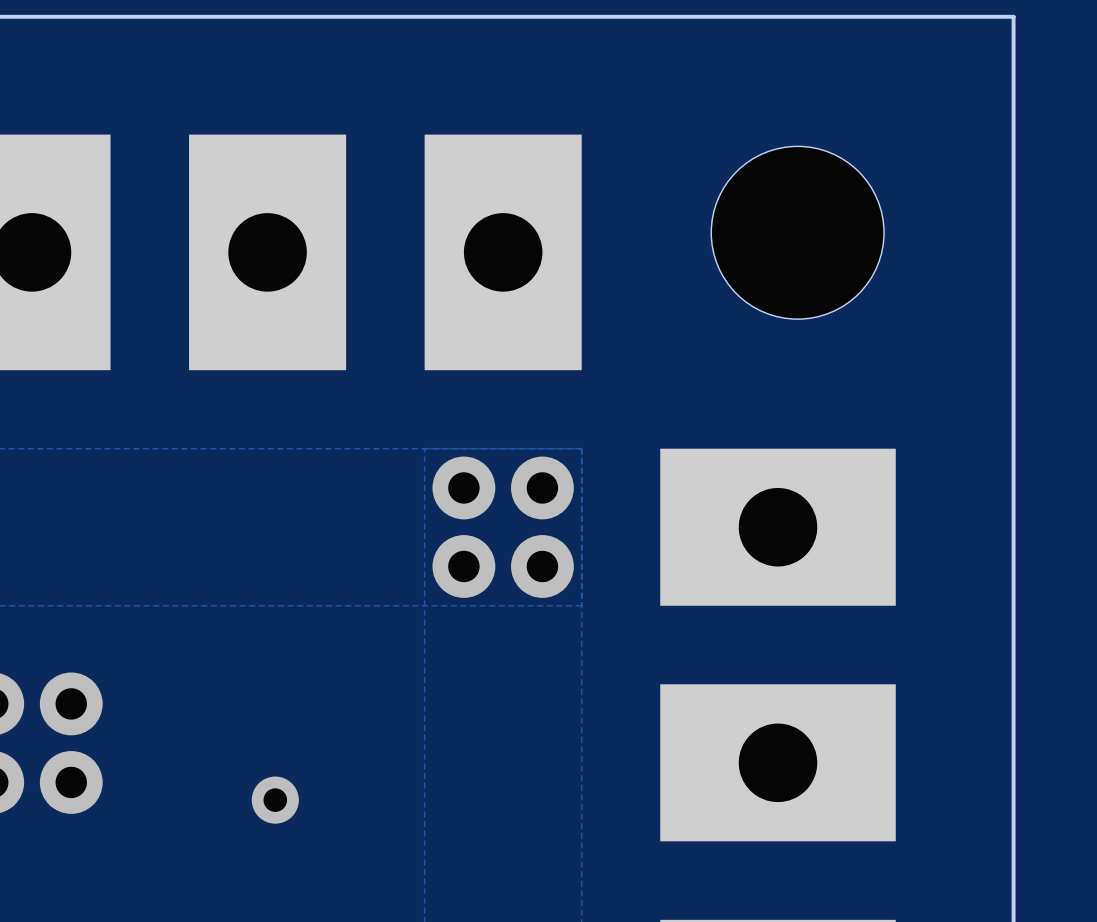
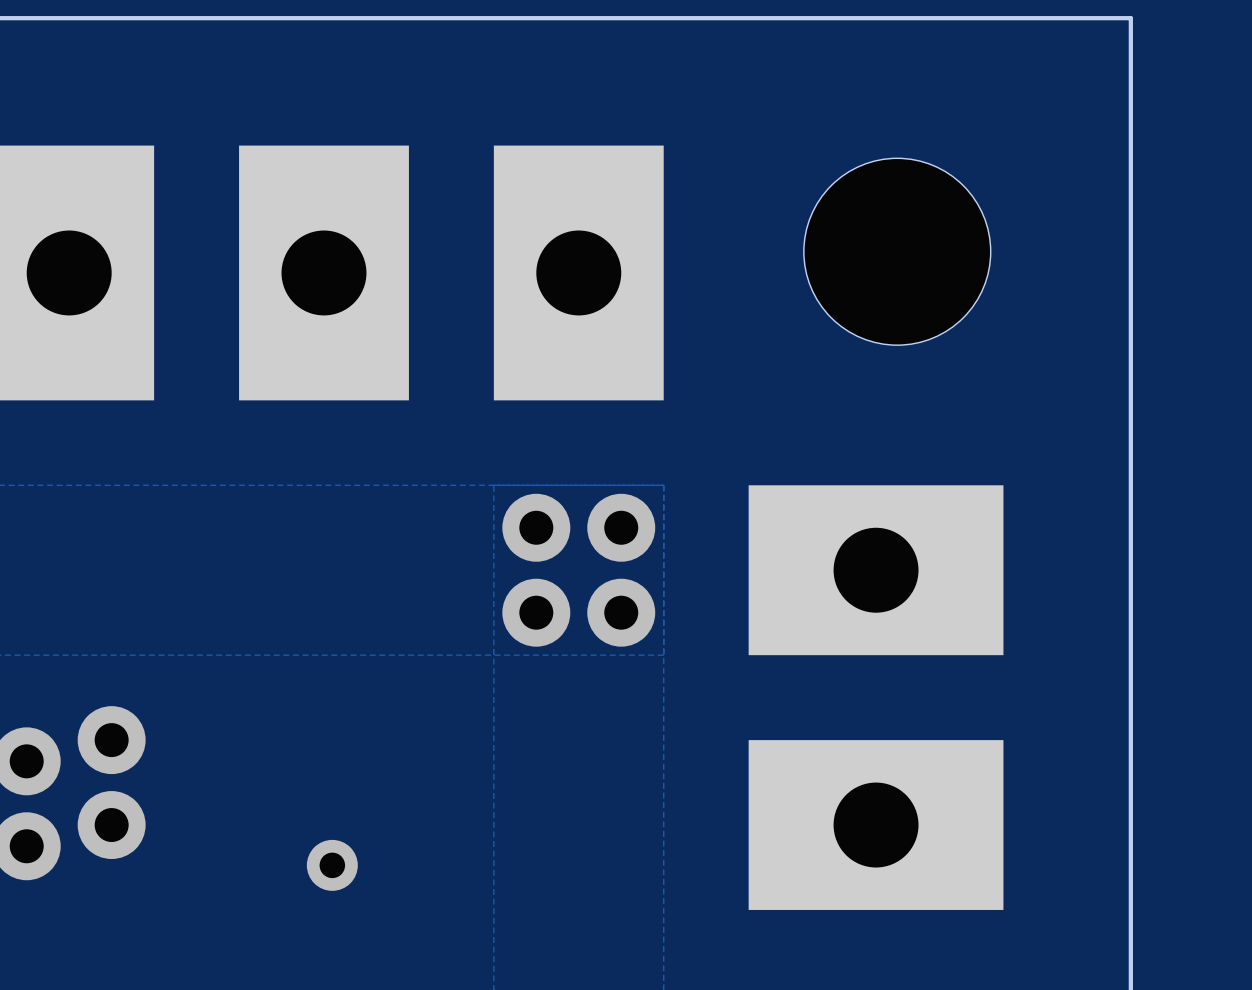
via position: (71, 703) -> (111, 740)
via position: (71, 782) -> (111, 825)

